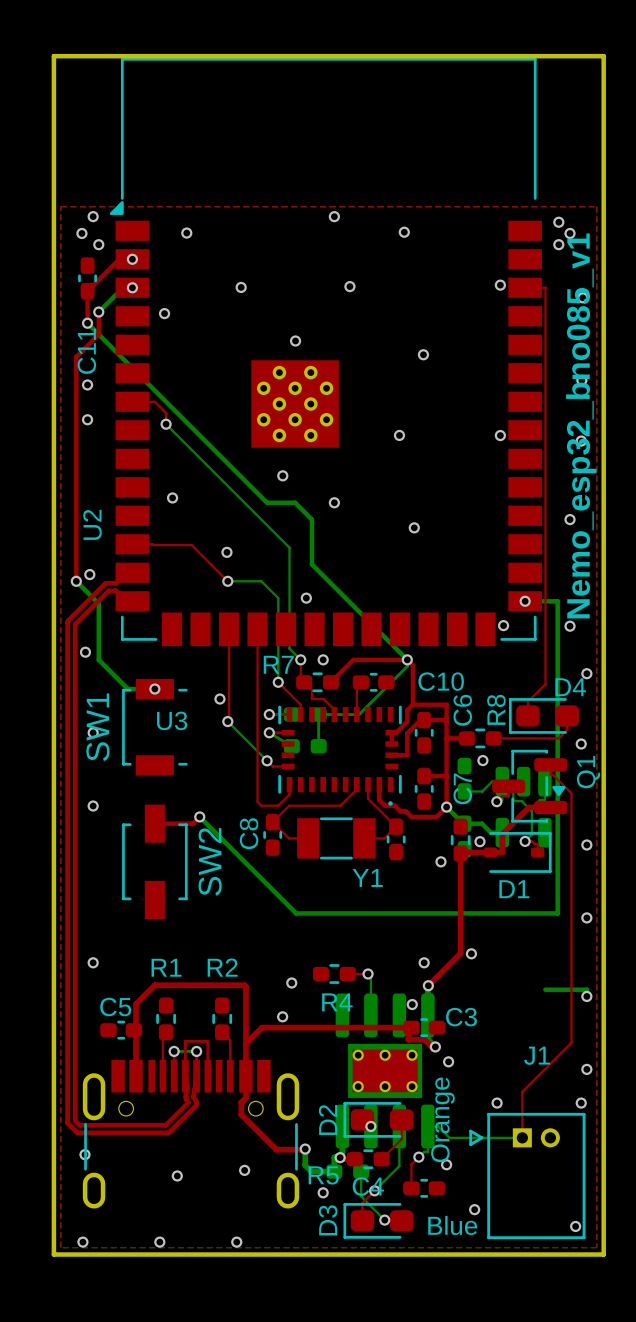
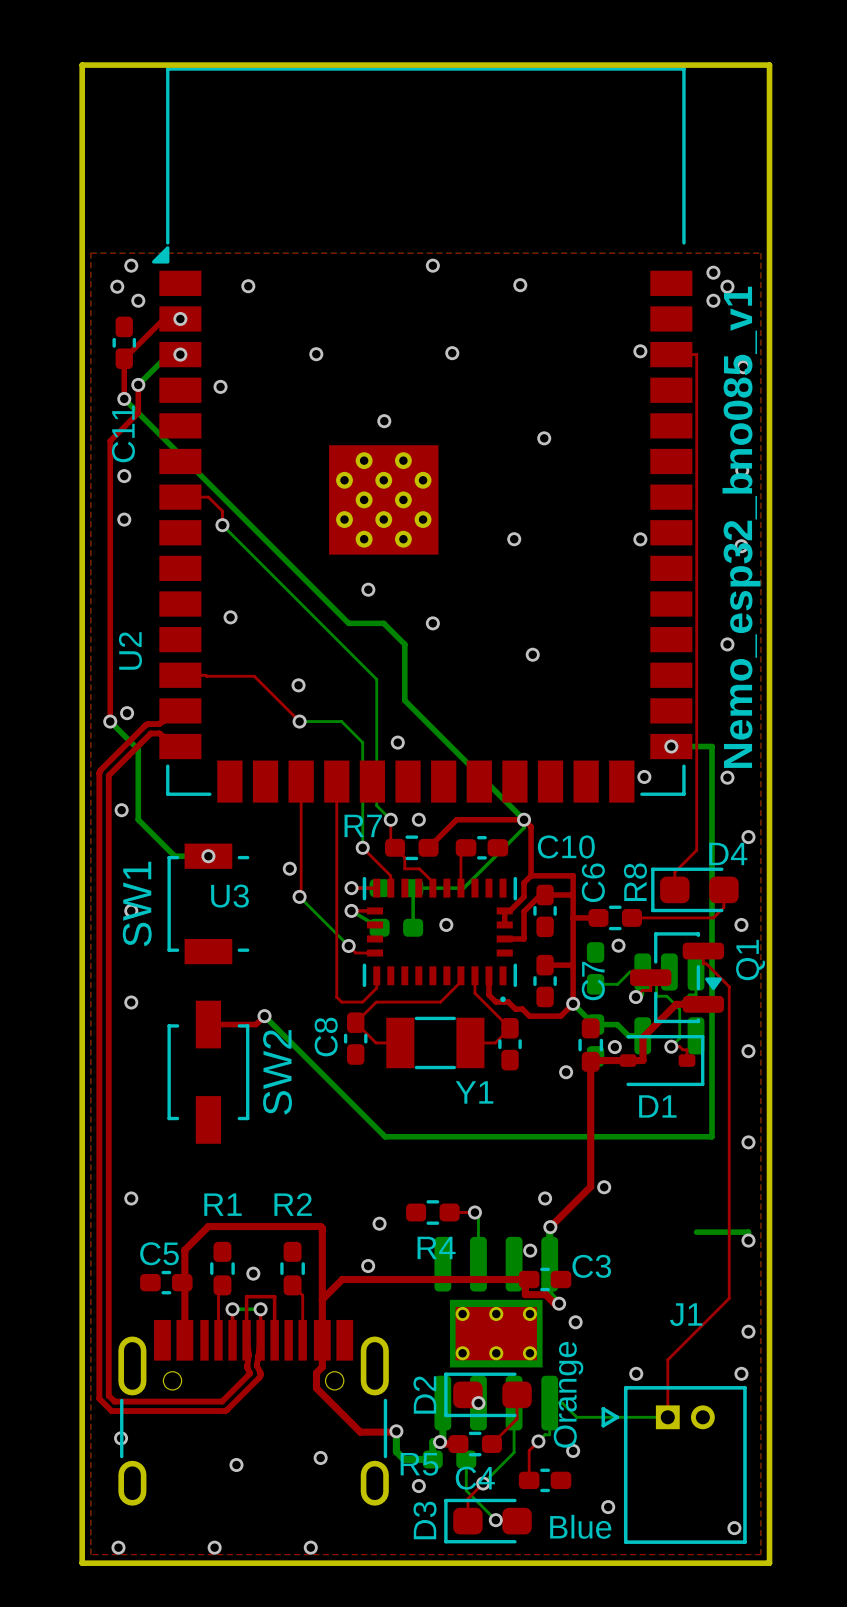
via: none -> (446, 924)
via: none -> (253, 1273)

